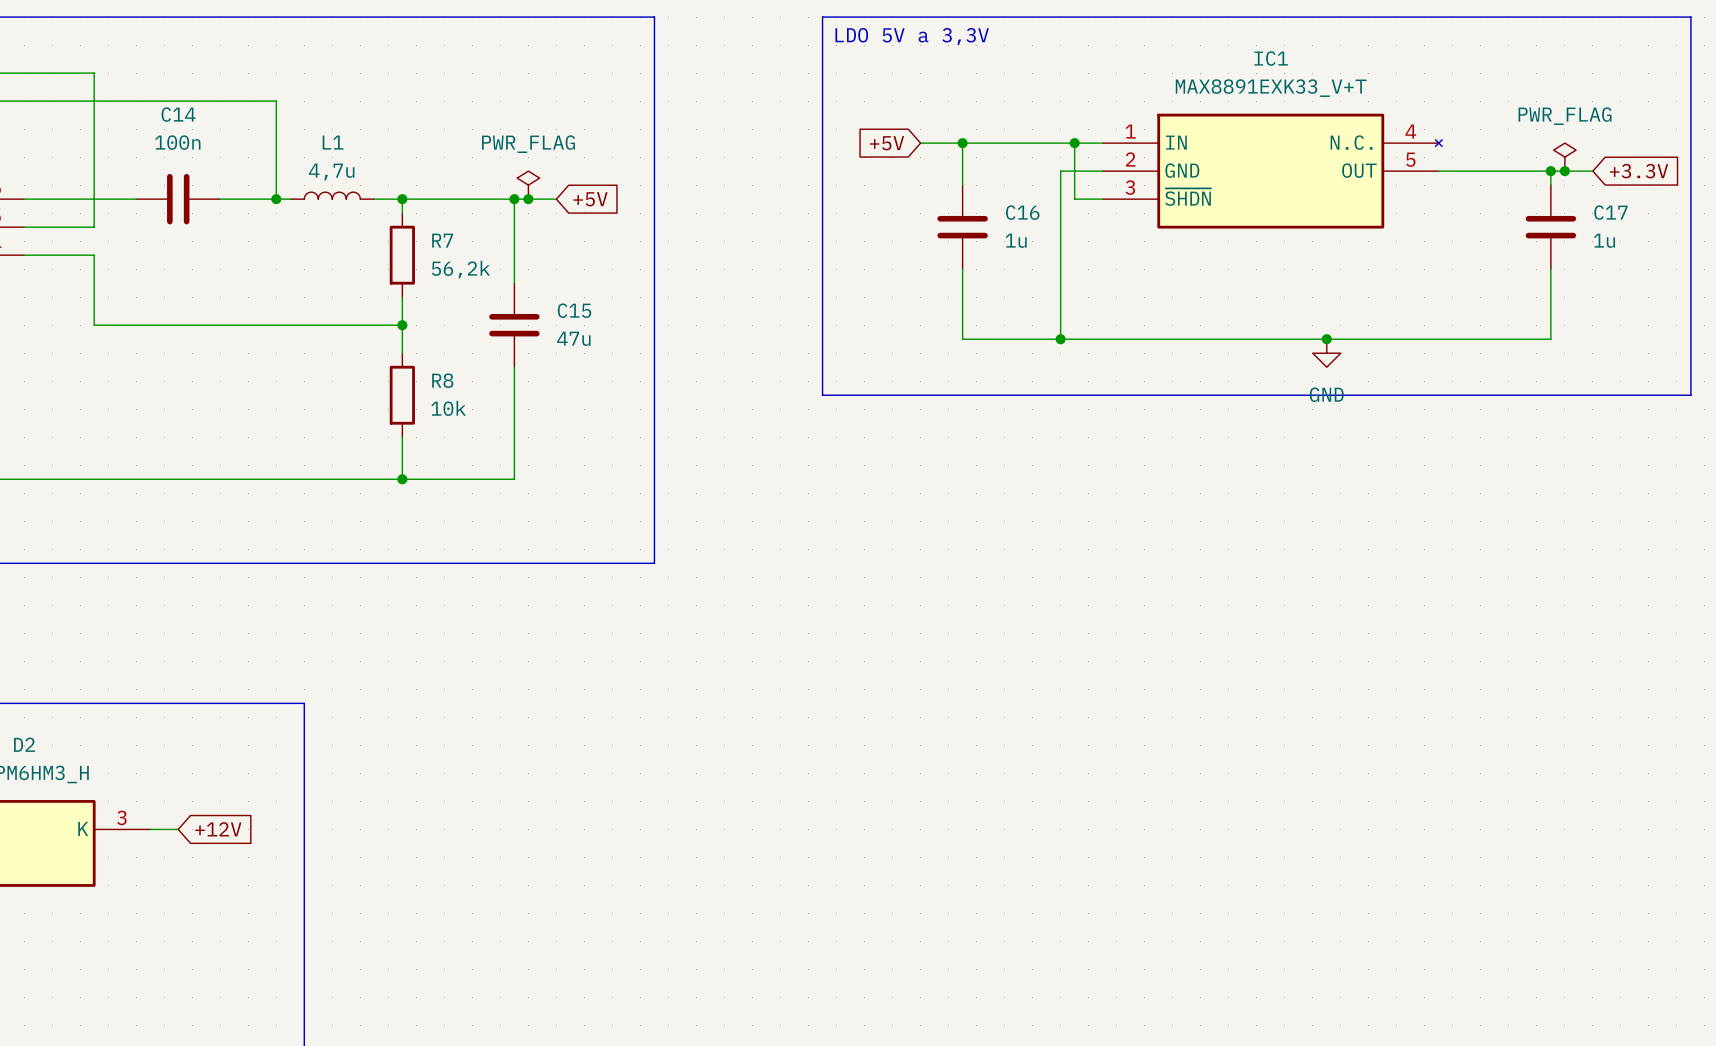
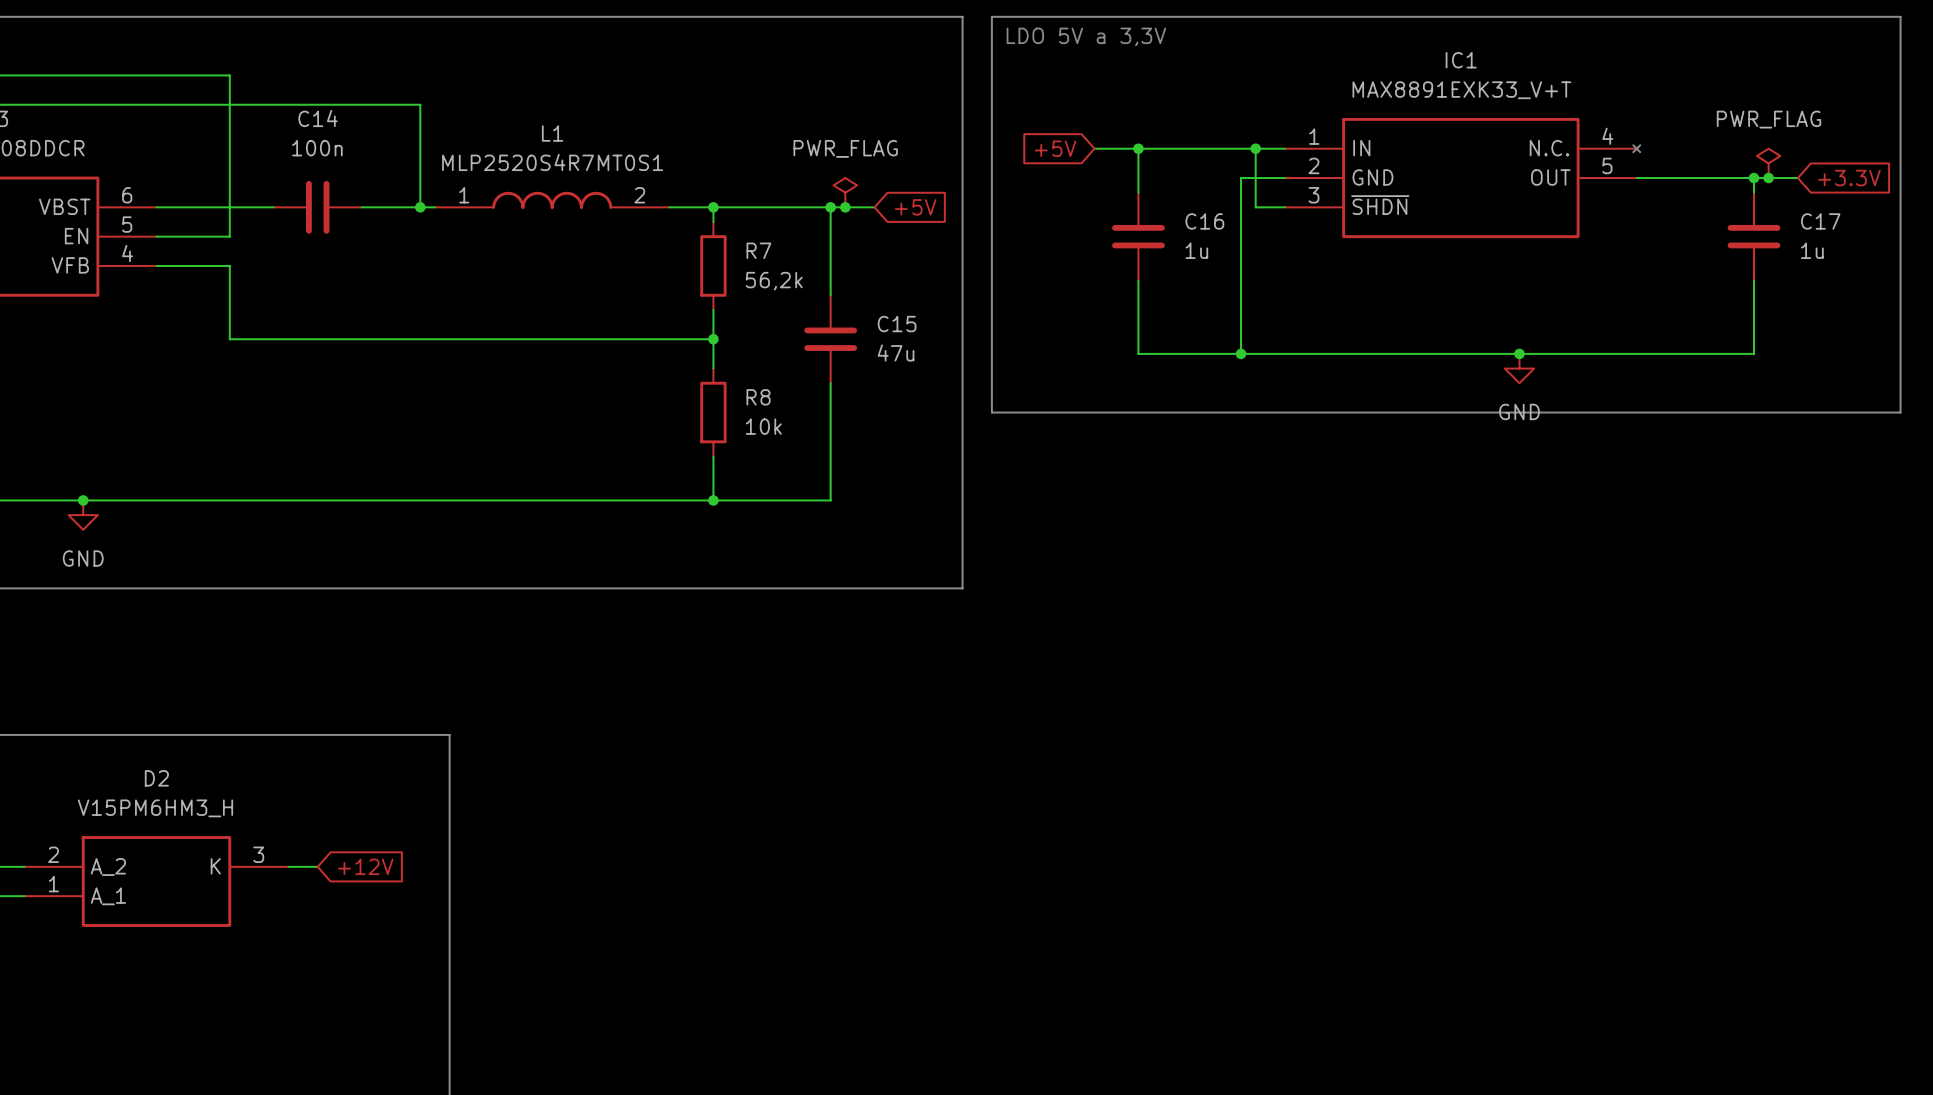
line: (654, 17) (654, 563) -> (816, 16) (962, 16) (962, 588) (816, 588)
L1 value: 4,7u (331, 172) -> MLP2520S4R7MT0S1 (552, 162)
power symbol position: PWR_FLAG (528, 185) -> PWR_FLAG (845, 192)
L1 symbol: [290, 192, 375, 200] -> [434, 191, 670, 209]
wire: (374, 199) (514, 199) (514, 283) -> none
wire: (402, 199) (402, 213) -> none
junction: (402, 199) -> none
junction: (514, 199) -> none
junction: (528, 199) -> none
junction: none -> (713, 207)
global label position: +5V (590, 199) -> +5V (915, 207)
wire: none -> (830, 207) (830, 295)
junction: none -> (830, 207)
junction: none -> (845, 207)
wire: none -> (874, 207) (713, 207) (713, 222)
R7 position: (402, 255) -> (713, 265)
wire: (402, 297) (402, 353) -> (713, 309) (713, 368)
wire: none -> (552, 339) (713, 339)
junction: (402, 325) -> none
C15 position: (514, 325) -> (830, 339)
junction: none -> (713, 339)
wire: (514, 367) (514, 479) -> (830, 383) (830, 500) (669, 500)
R8 position: (402, 395) -> (713, 412)
wire: (402, 437) (402, 479) -> (713, 456) (713, 500)
junction: (402, 479) -> none
junction: none -> (713, 500)

